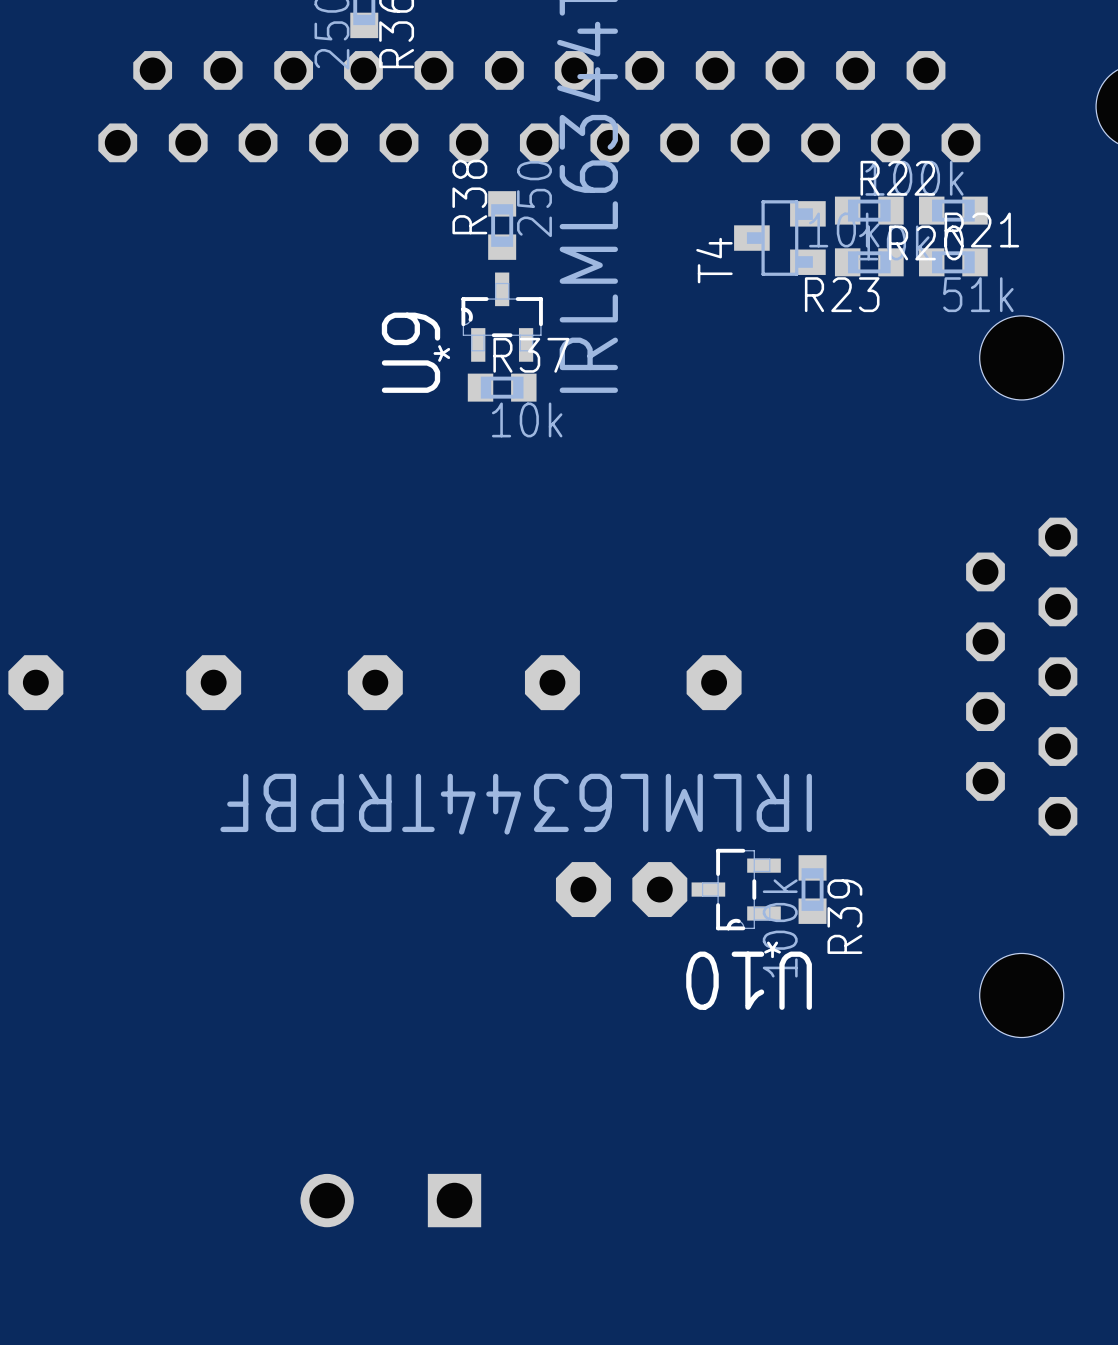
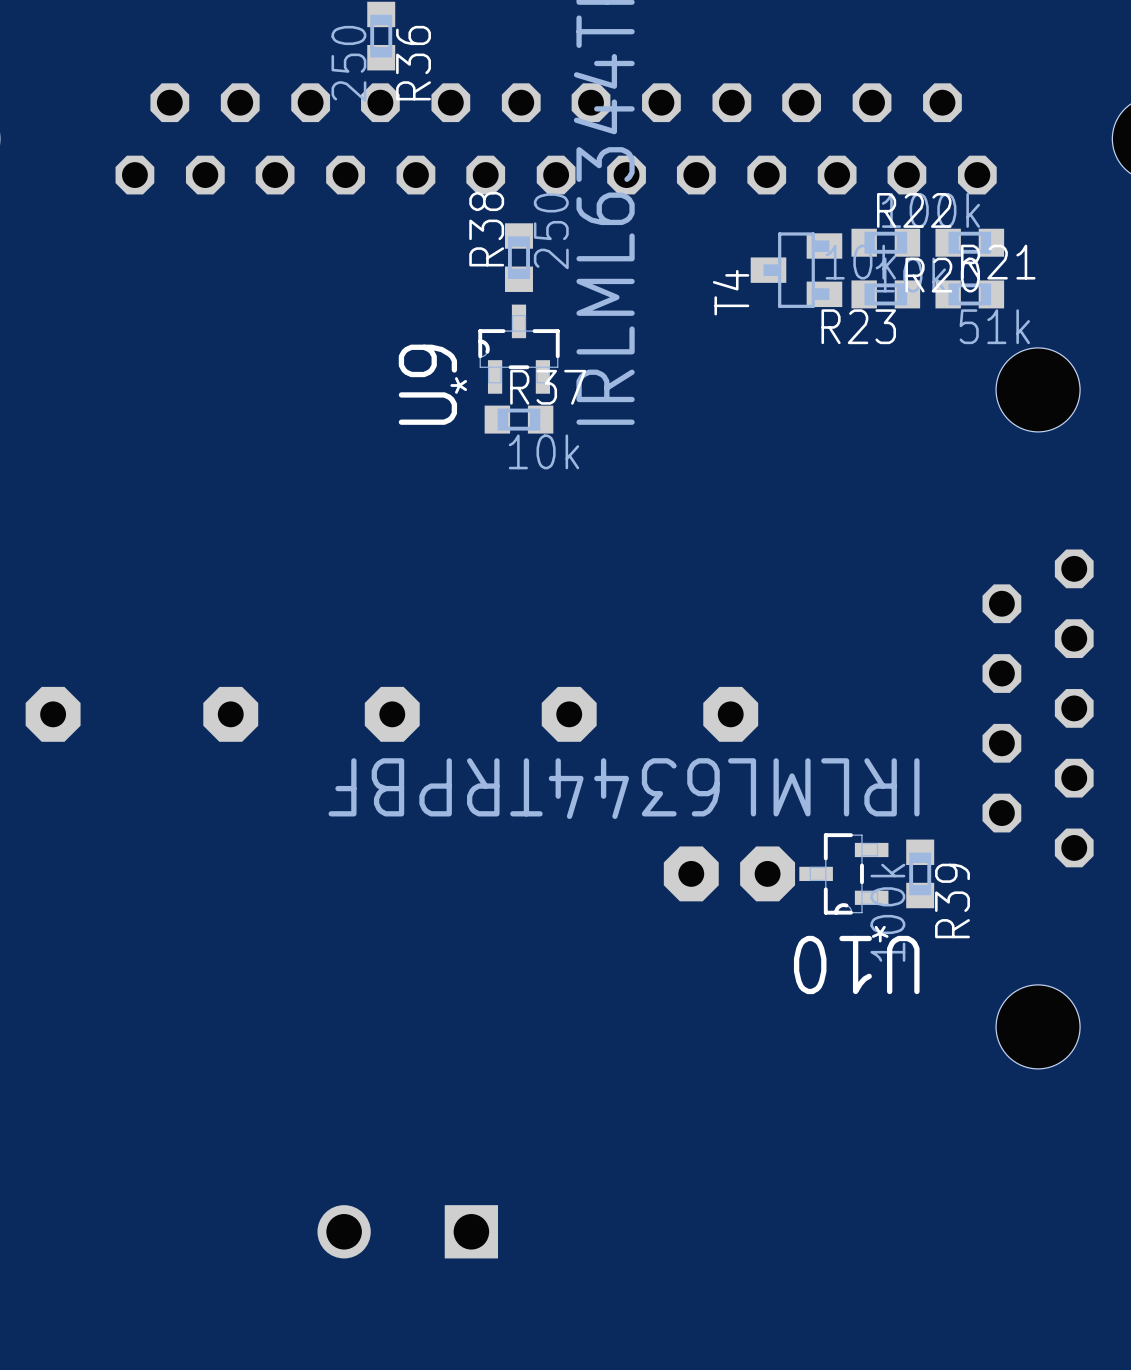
part: none -> (767, 873)
part: (583, 889) -> none
part position: (659, 889) -> (691, 873)
U10 position: (736, 889) -> (843, 873)
R39 position: (812, 889) -> (920, 873)

